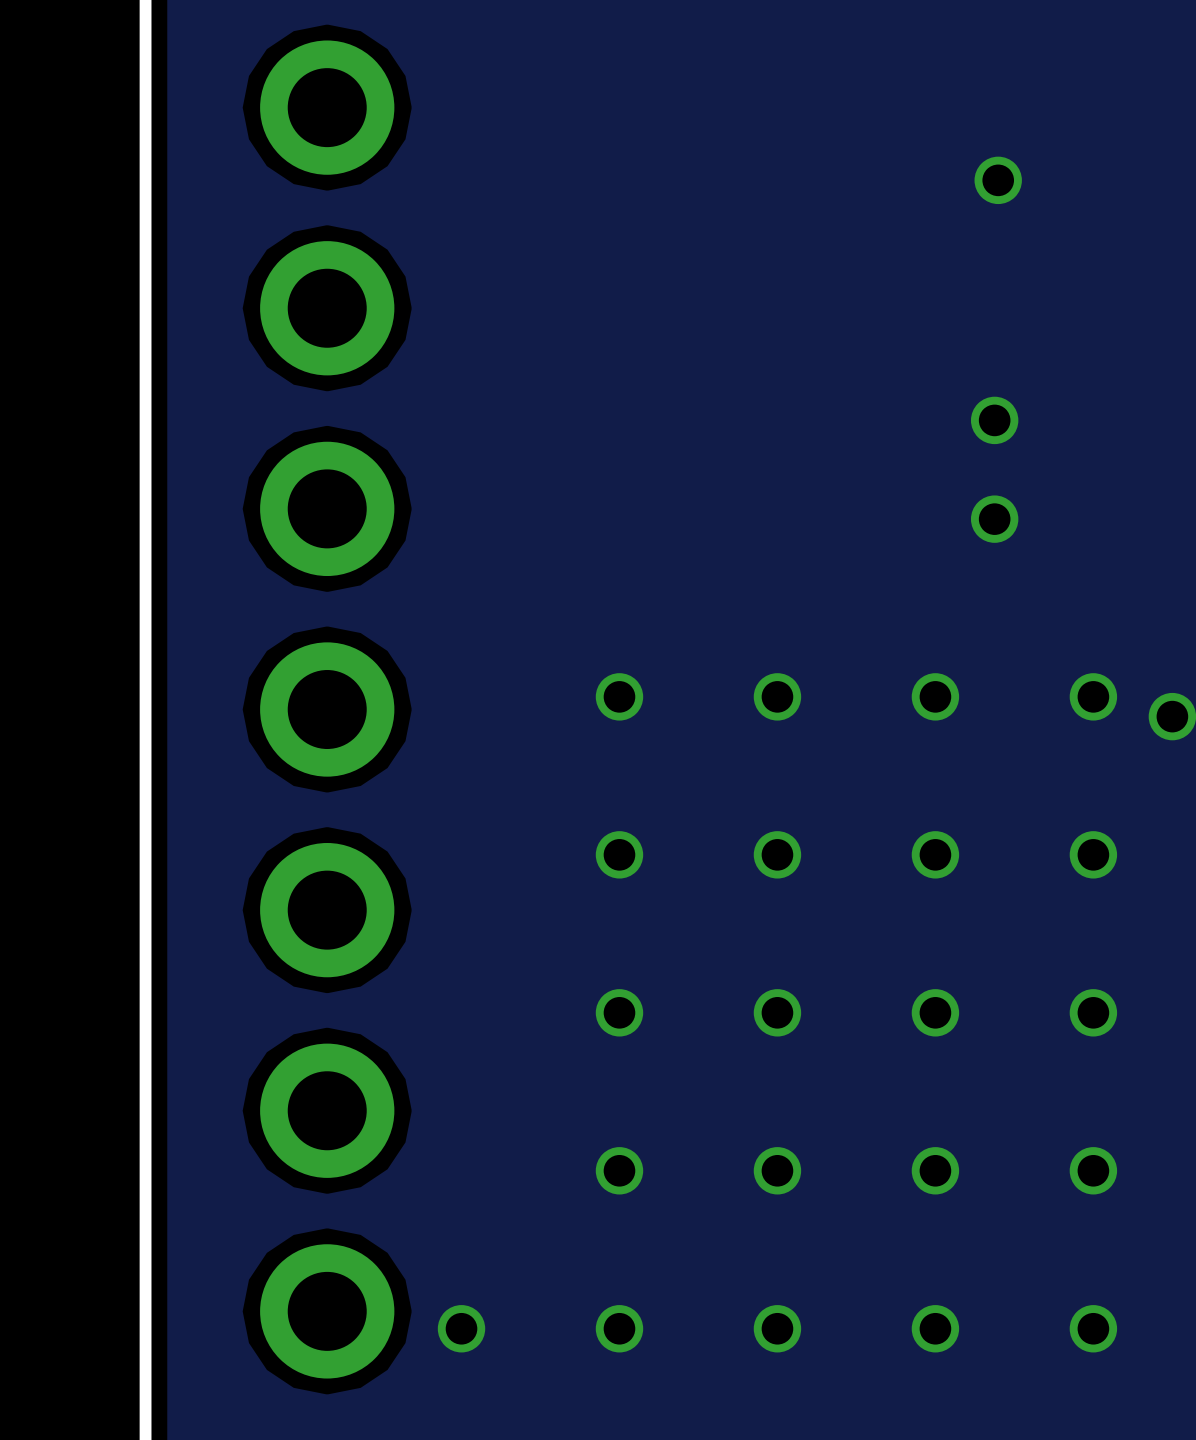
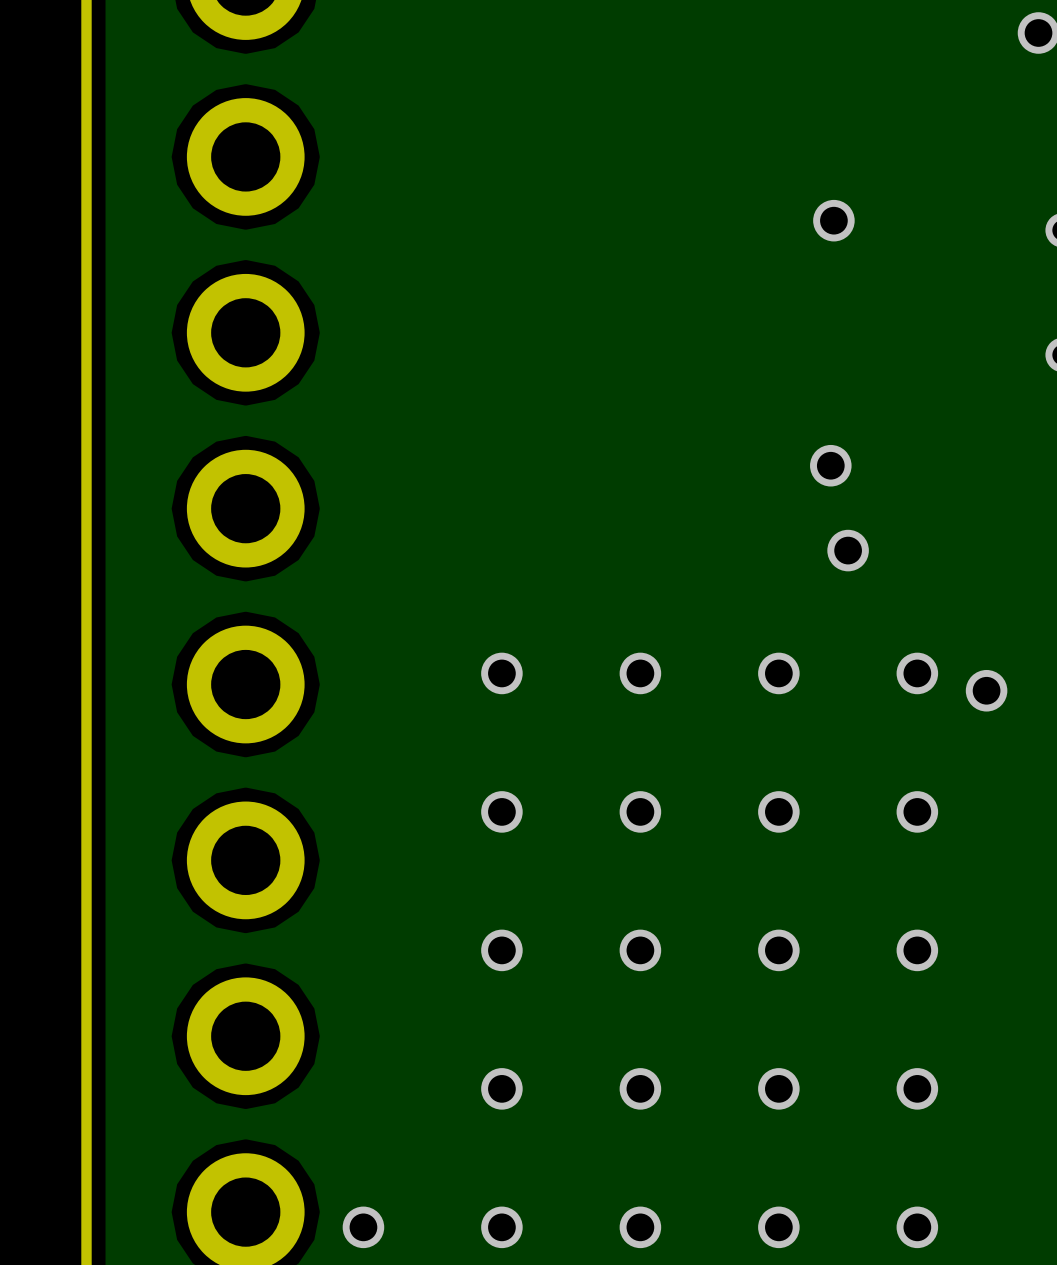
via position: (994, 420) -> (830, 465)
via position: (994, 519) -> (848, 550)

